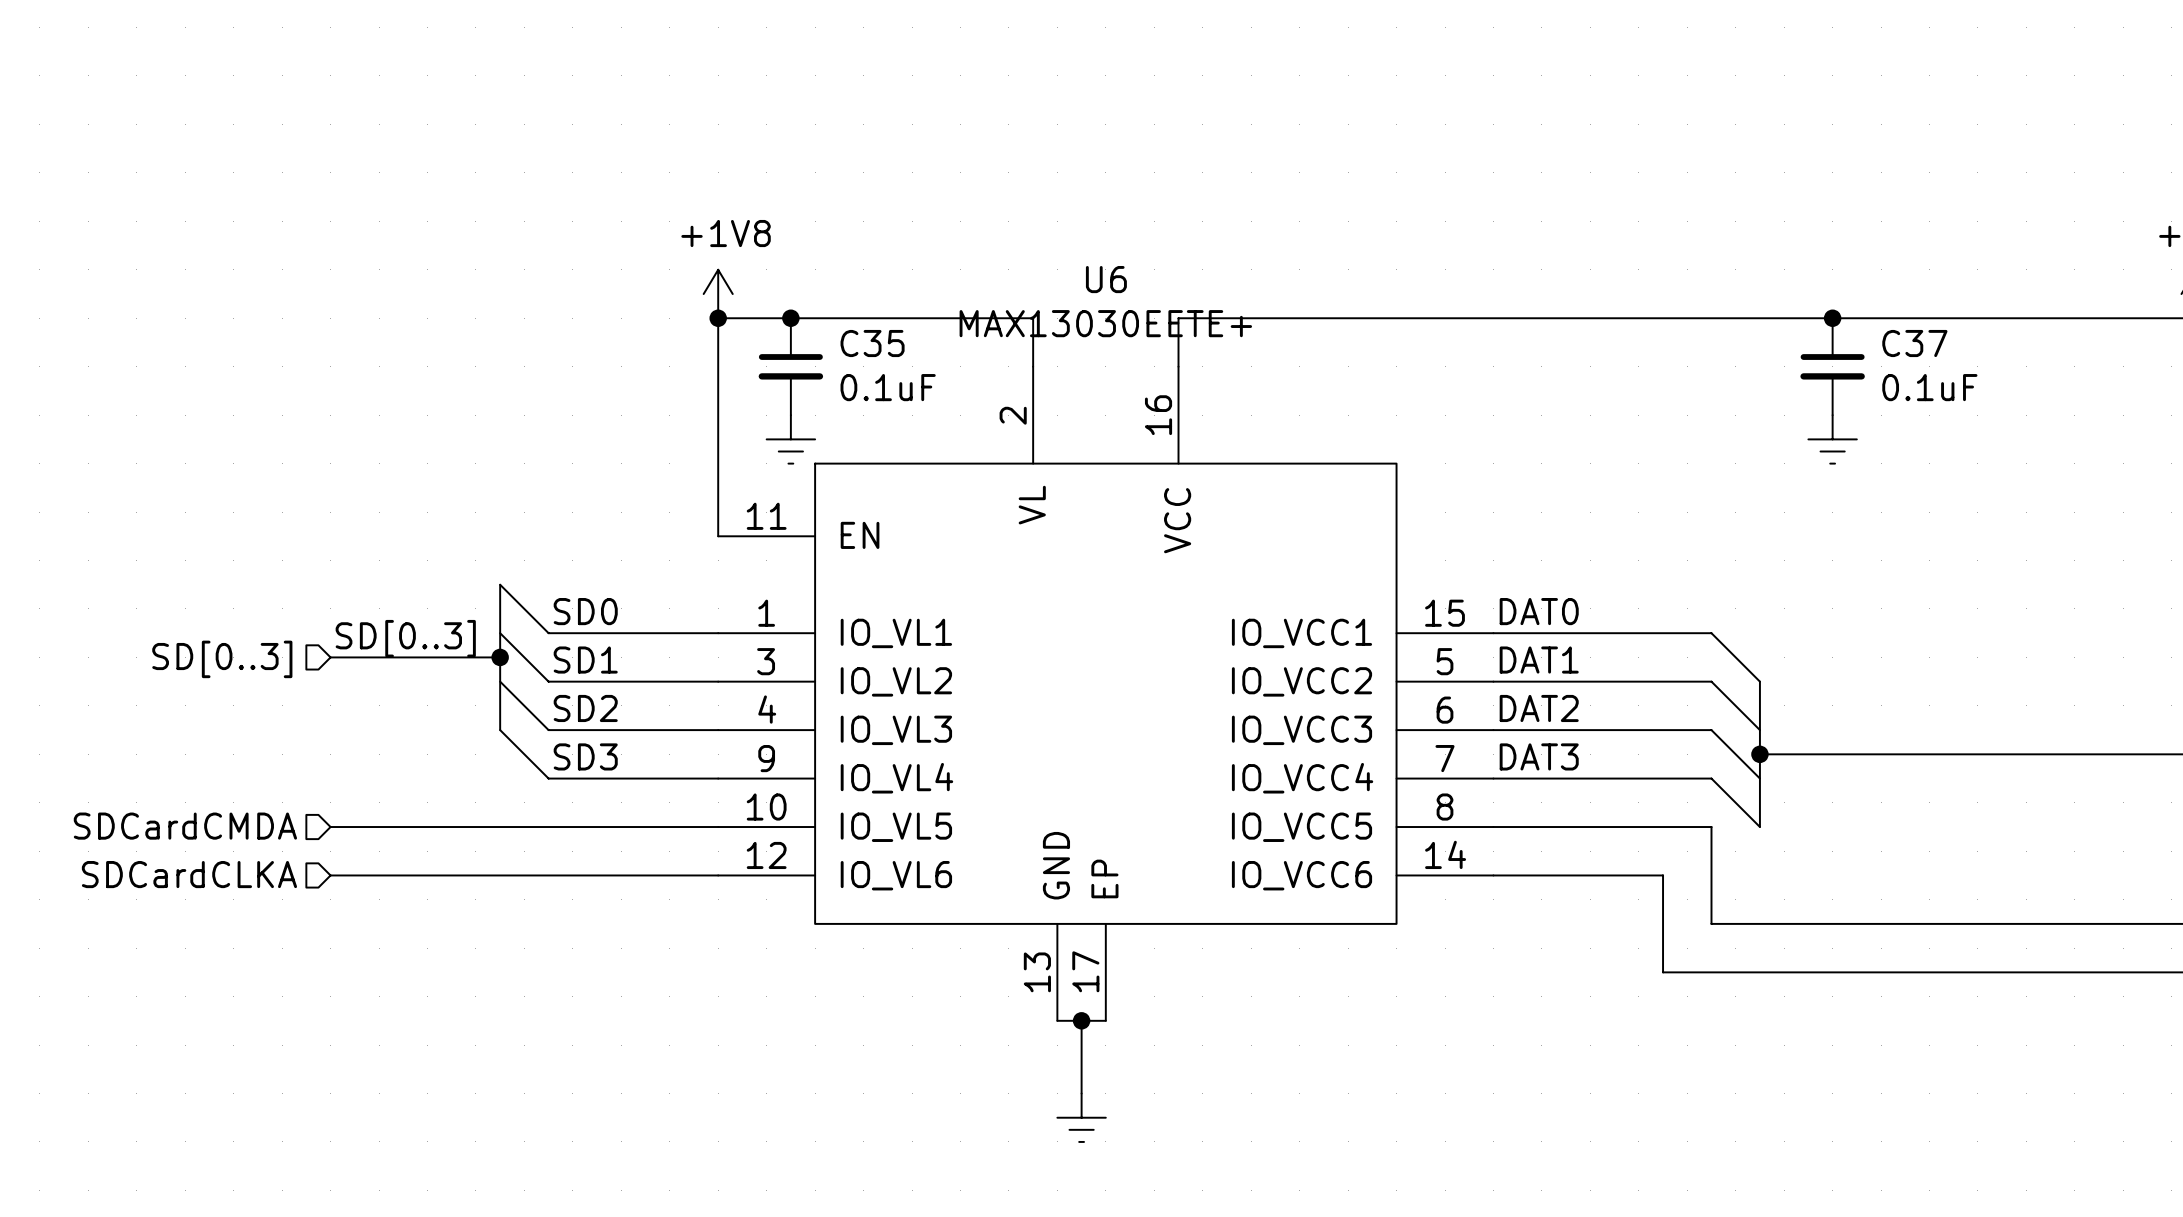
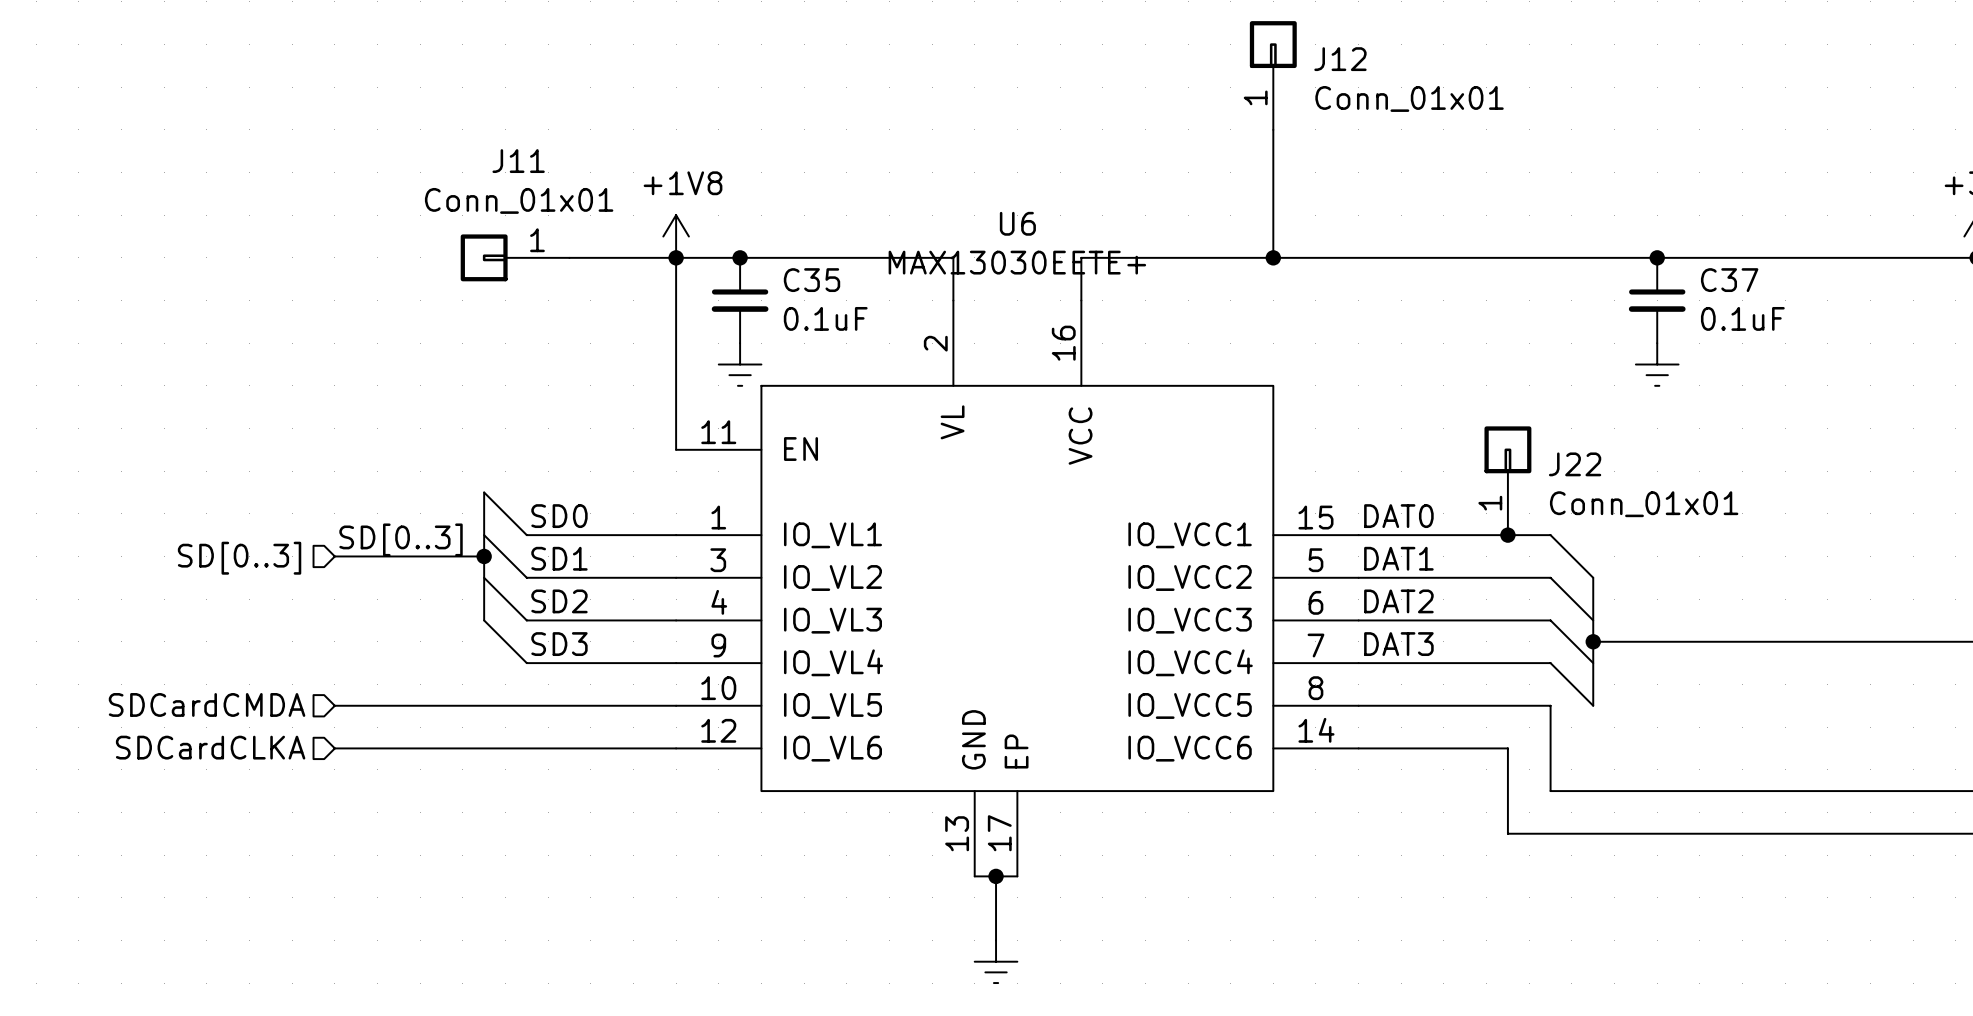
J12: none -> Conn_01x01 (1273, 75)
wire: none -> (1273, 129) (1273, 257)
J11: none -> Conn_01x01 (515, 257)
wire: none -> (569, 257) (676, 257)
junction: none -> (1273, 257)
J22: none -> Conn_01x01 (1507, 480)
junction: none -> (1507, 535)

